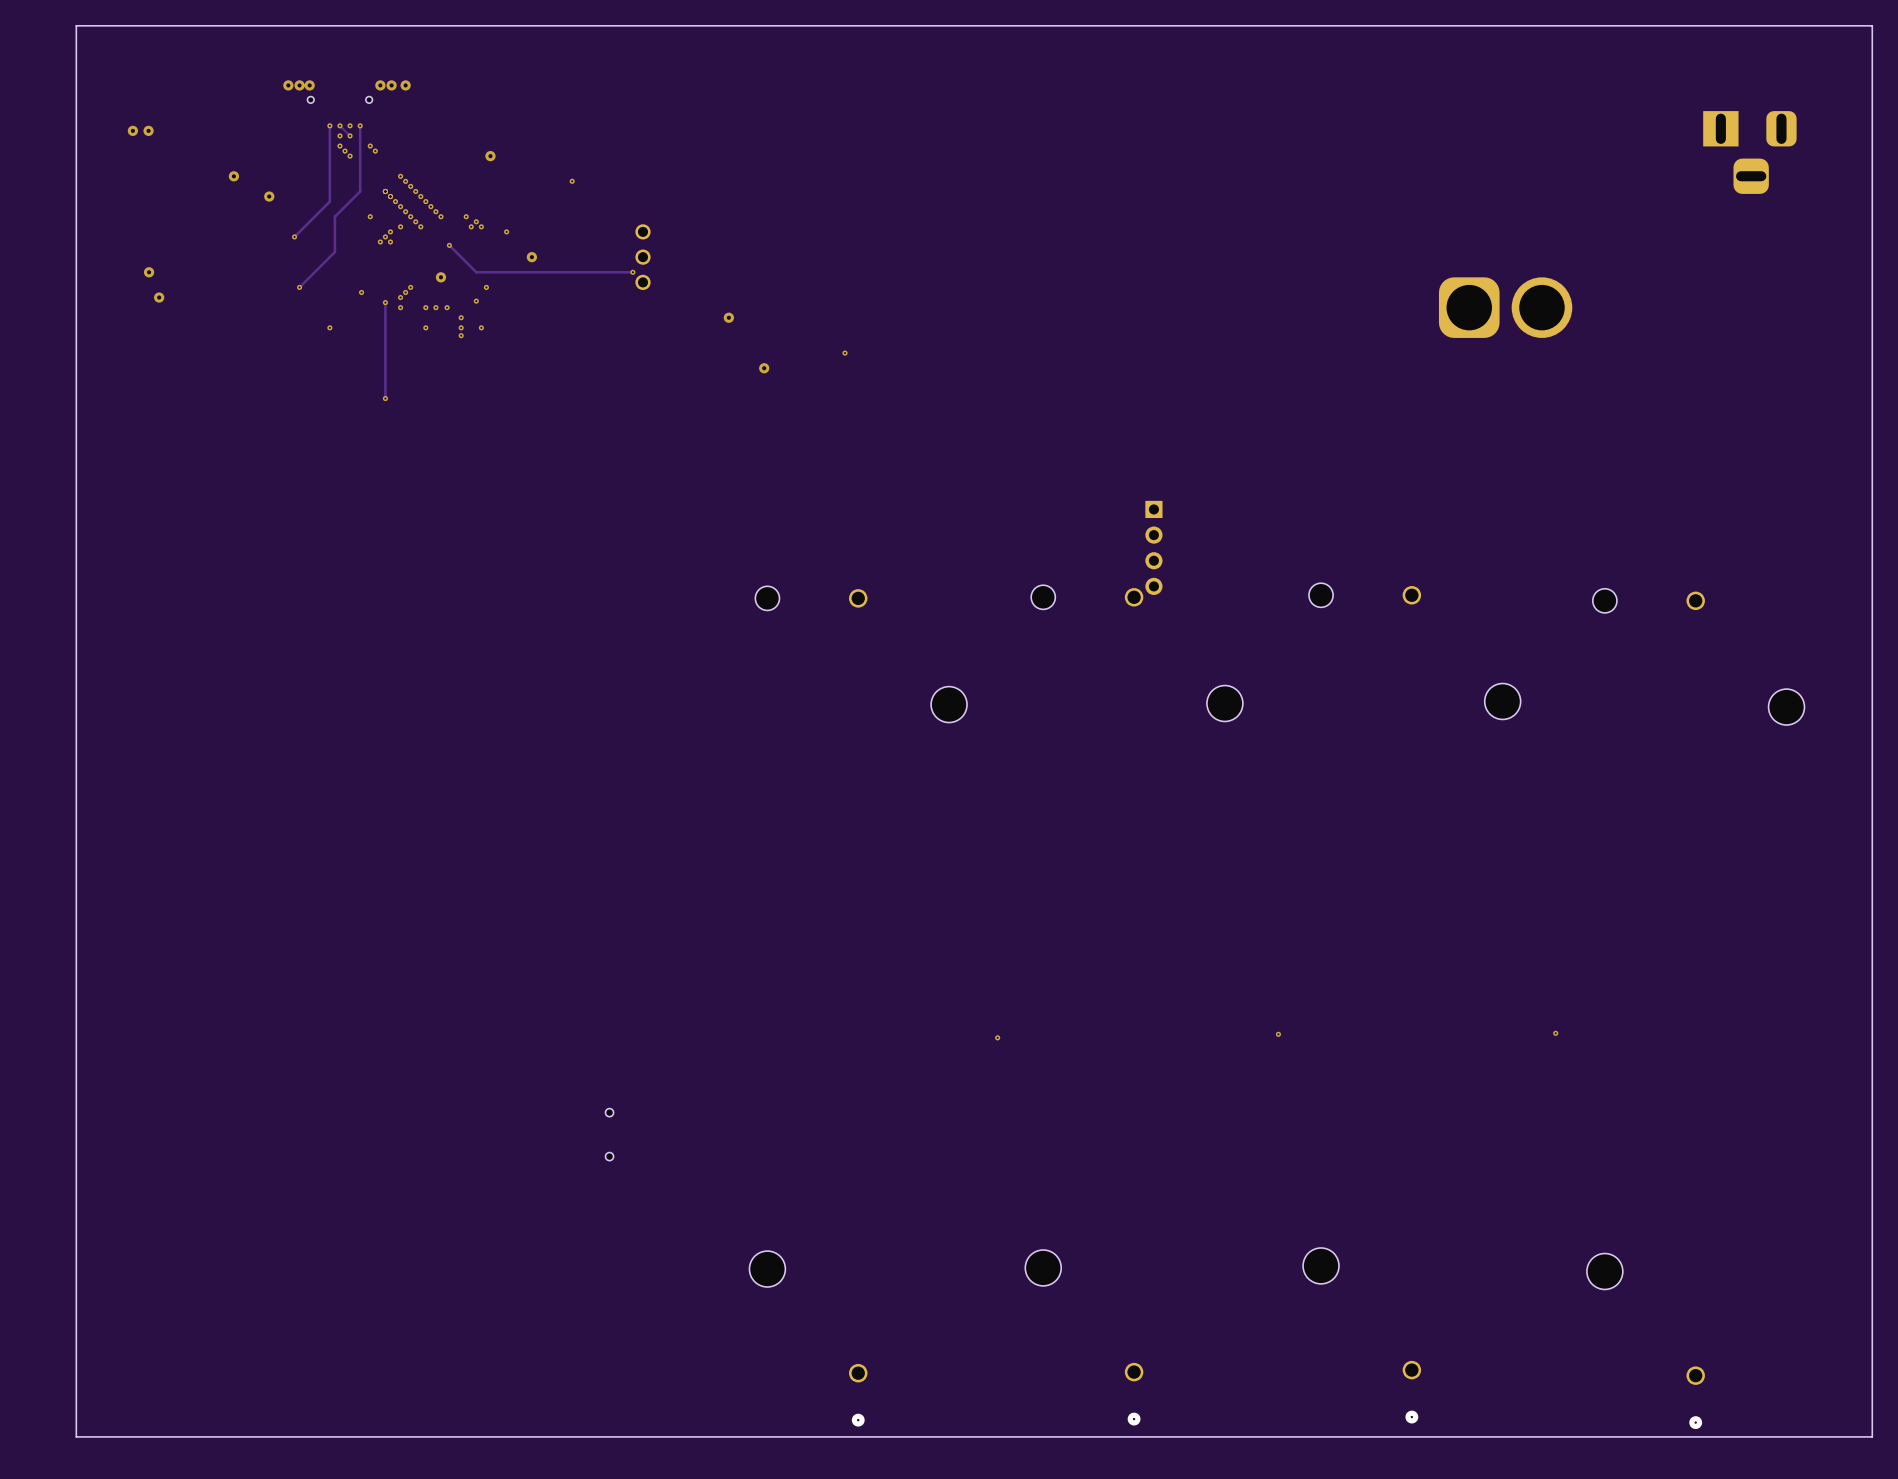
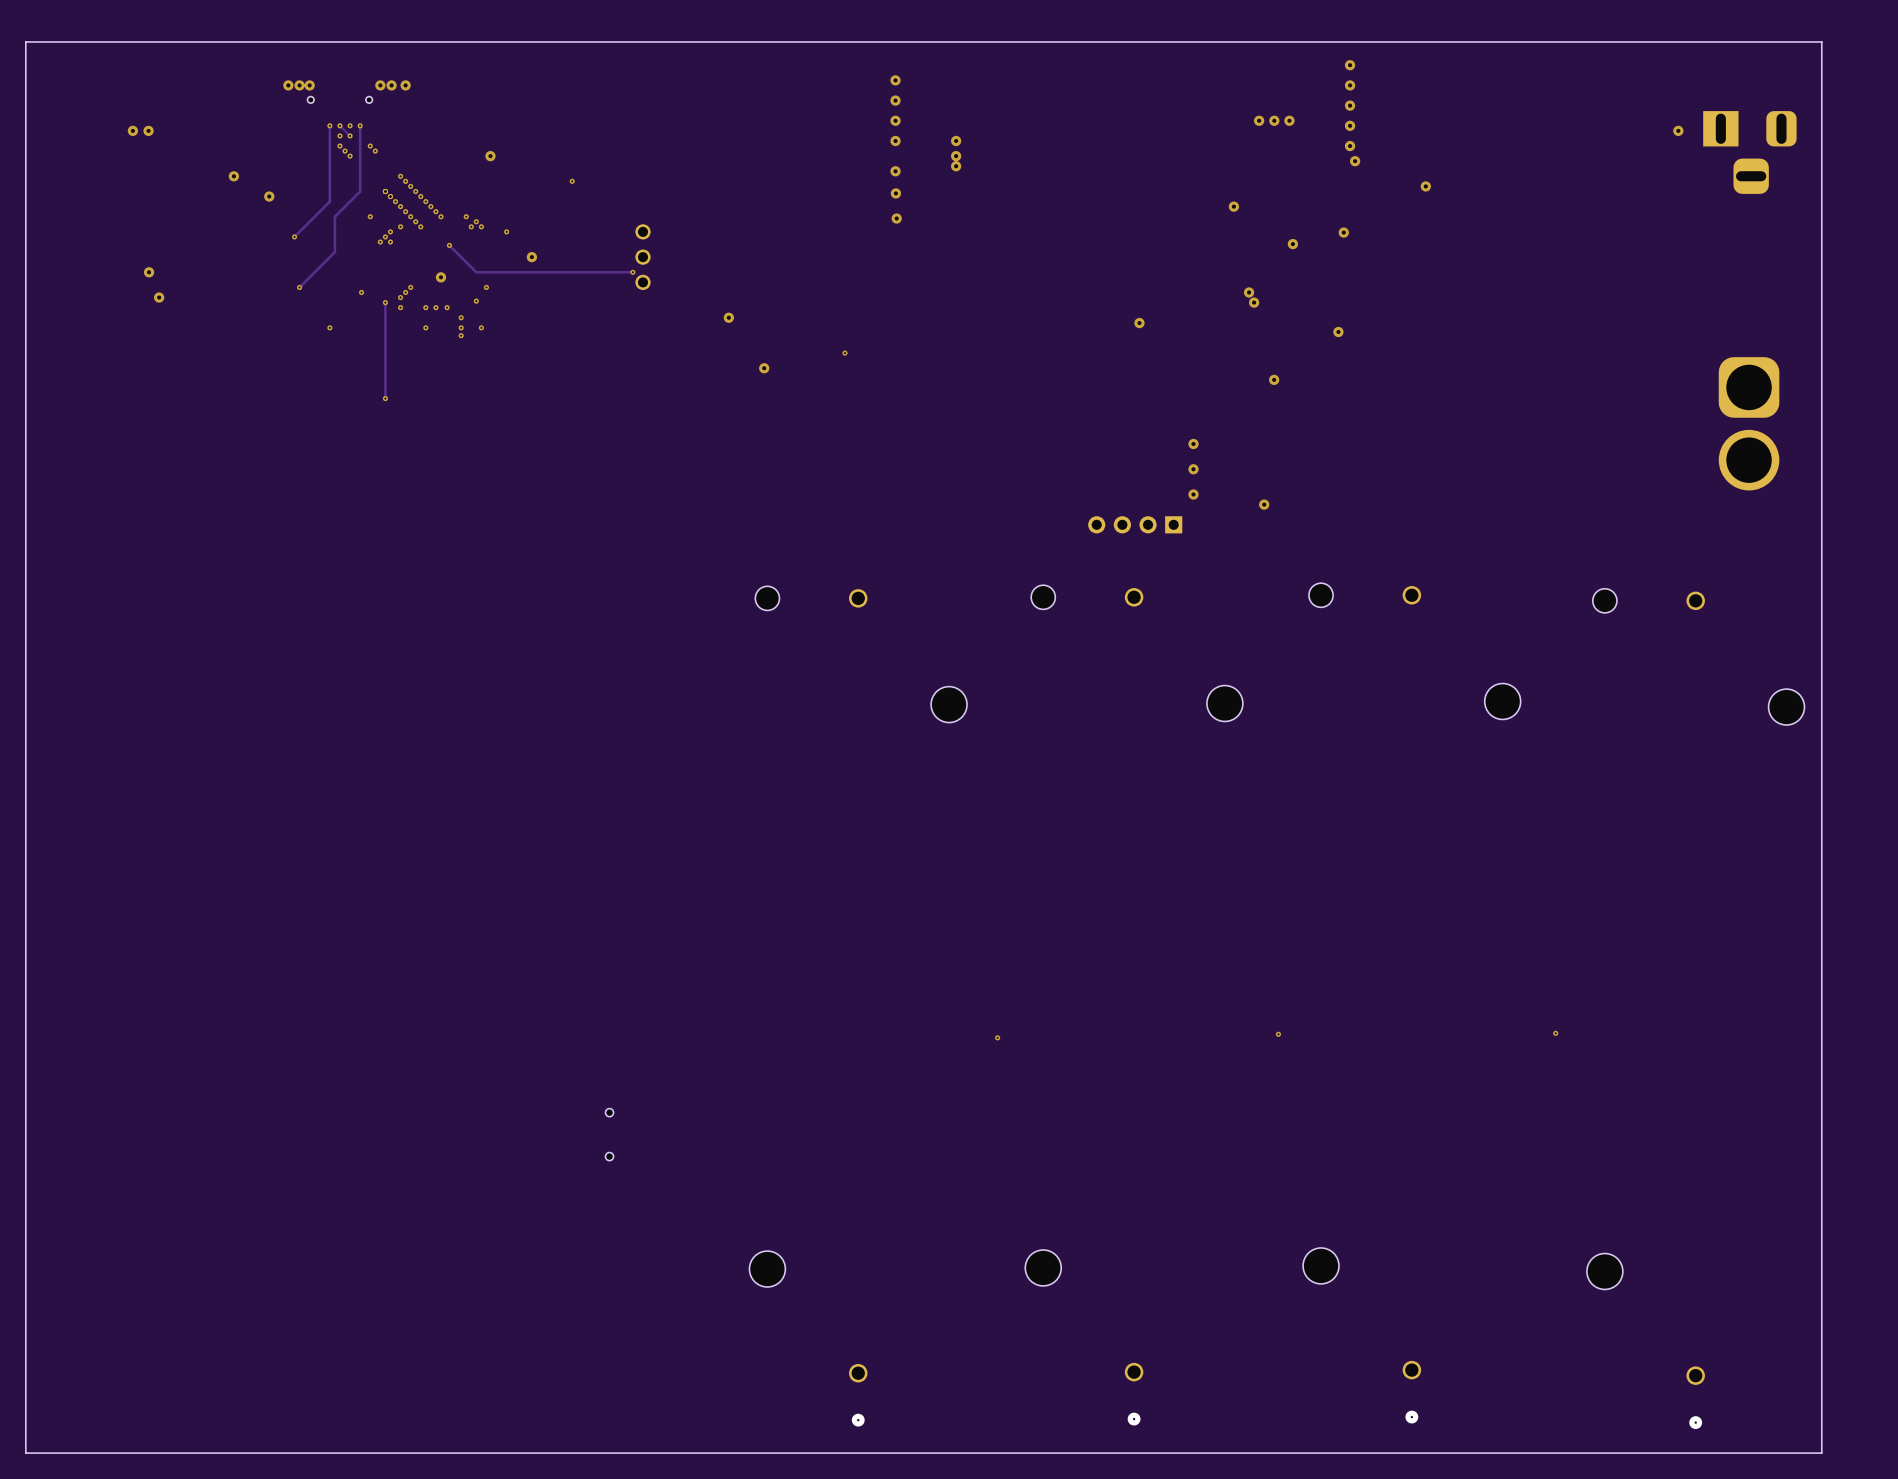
board edge: (1872, 25) (76, 25) (76, 1436) (1872, 1436) (1872, 25) -> (1821, 41) (25, 41) (25, 1453) (1821, 1453) (1821, 41)
via: none -> (1350, 65)
via: none -> (895, 80)
via: none -> (1350, 85)
via: none -> (895, 100)
via: none -> (1350, 105)
via: none -> (895, 120)
via: none -> (1259, 120)
via: none -> (1274, 120)
via: none -> (1289, 120)
via: none -> (1350, 125)
via: none -> (1678, 130)
via: none -> (895, 140)
via: none -> (956, 140)
via: none -> (1350, 146)
via: none -> (956, 156)
via: none -> (1355, 161)
via: none -> (956, 166)
via: none -> (895, 171)
via: none -> (1425, 186)
via: none -> (895, 193)
via: none -> (1233, 206)
via: none -> (896, 218)
via: none -> (1343, 232)
via: none -> (1292, 244)
via: none -> (1249, 292)
via: none -> (1254, 302)
part: (1505, 307) -> none
via: none -> (1139, 323)
via: none -> (1338, 332)
via: none -> (1274, 379)
part: none -> (1749, 423)
via: none -> (1193, 444)
via: none -> (1193, 469)
via: none -> (1193, 494)
via: none -> (1264, 504)
part rotation: 0° (1153, 547) -> 90° clockwise (1135, 524)

